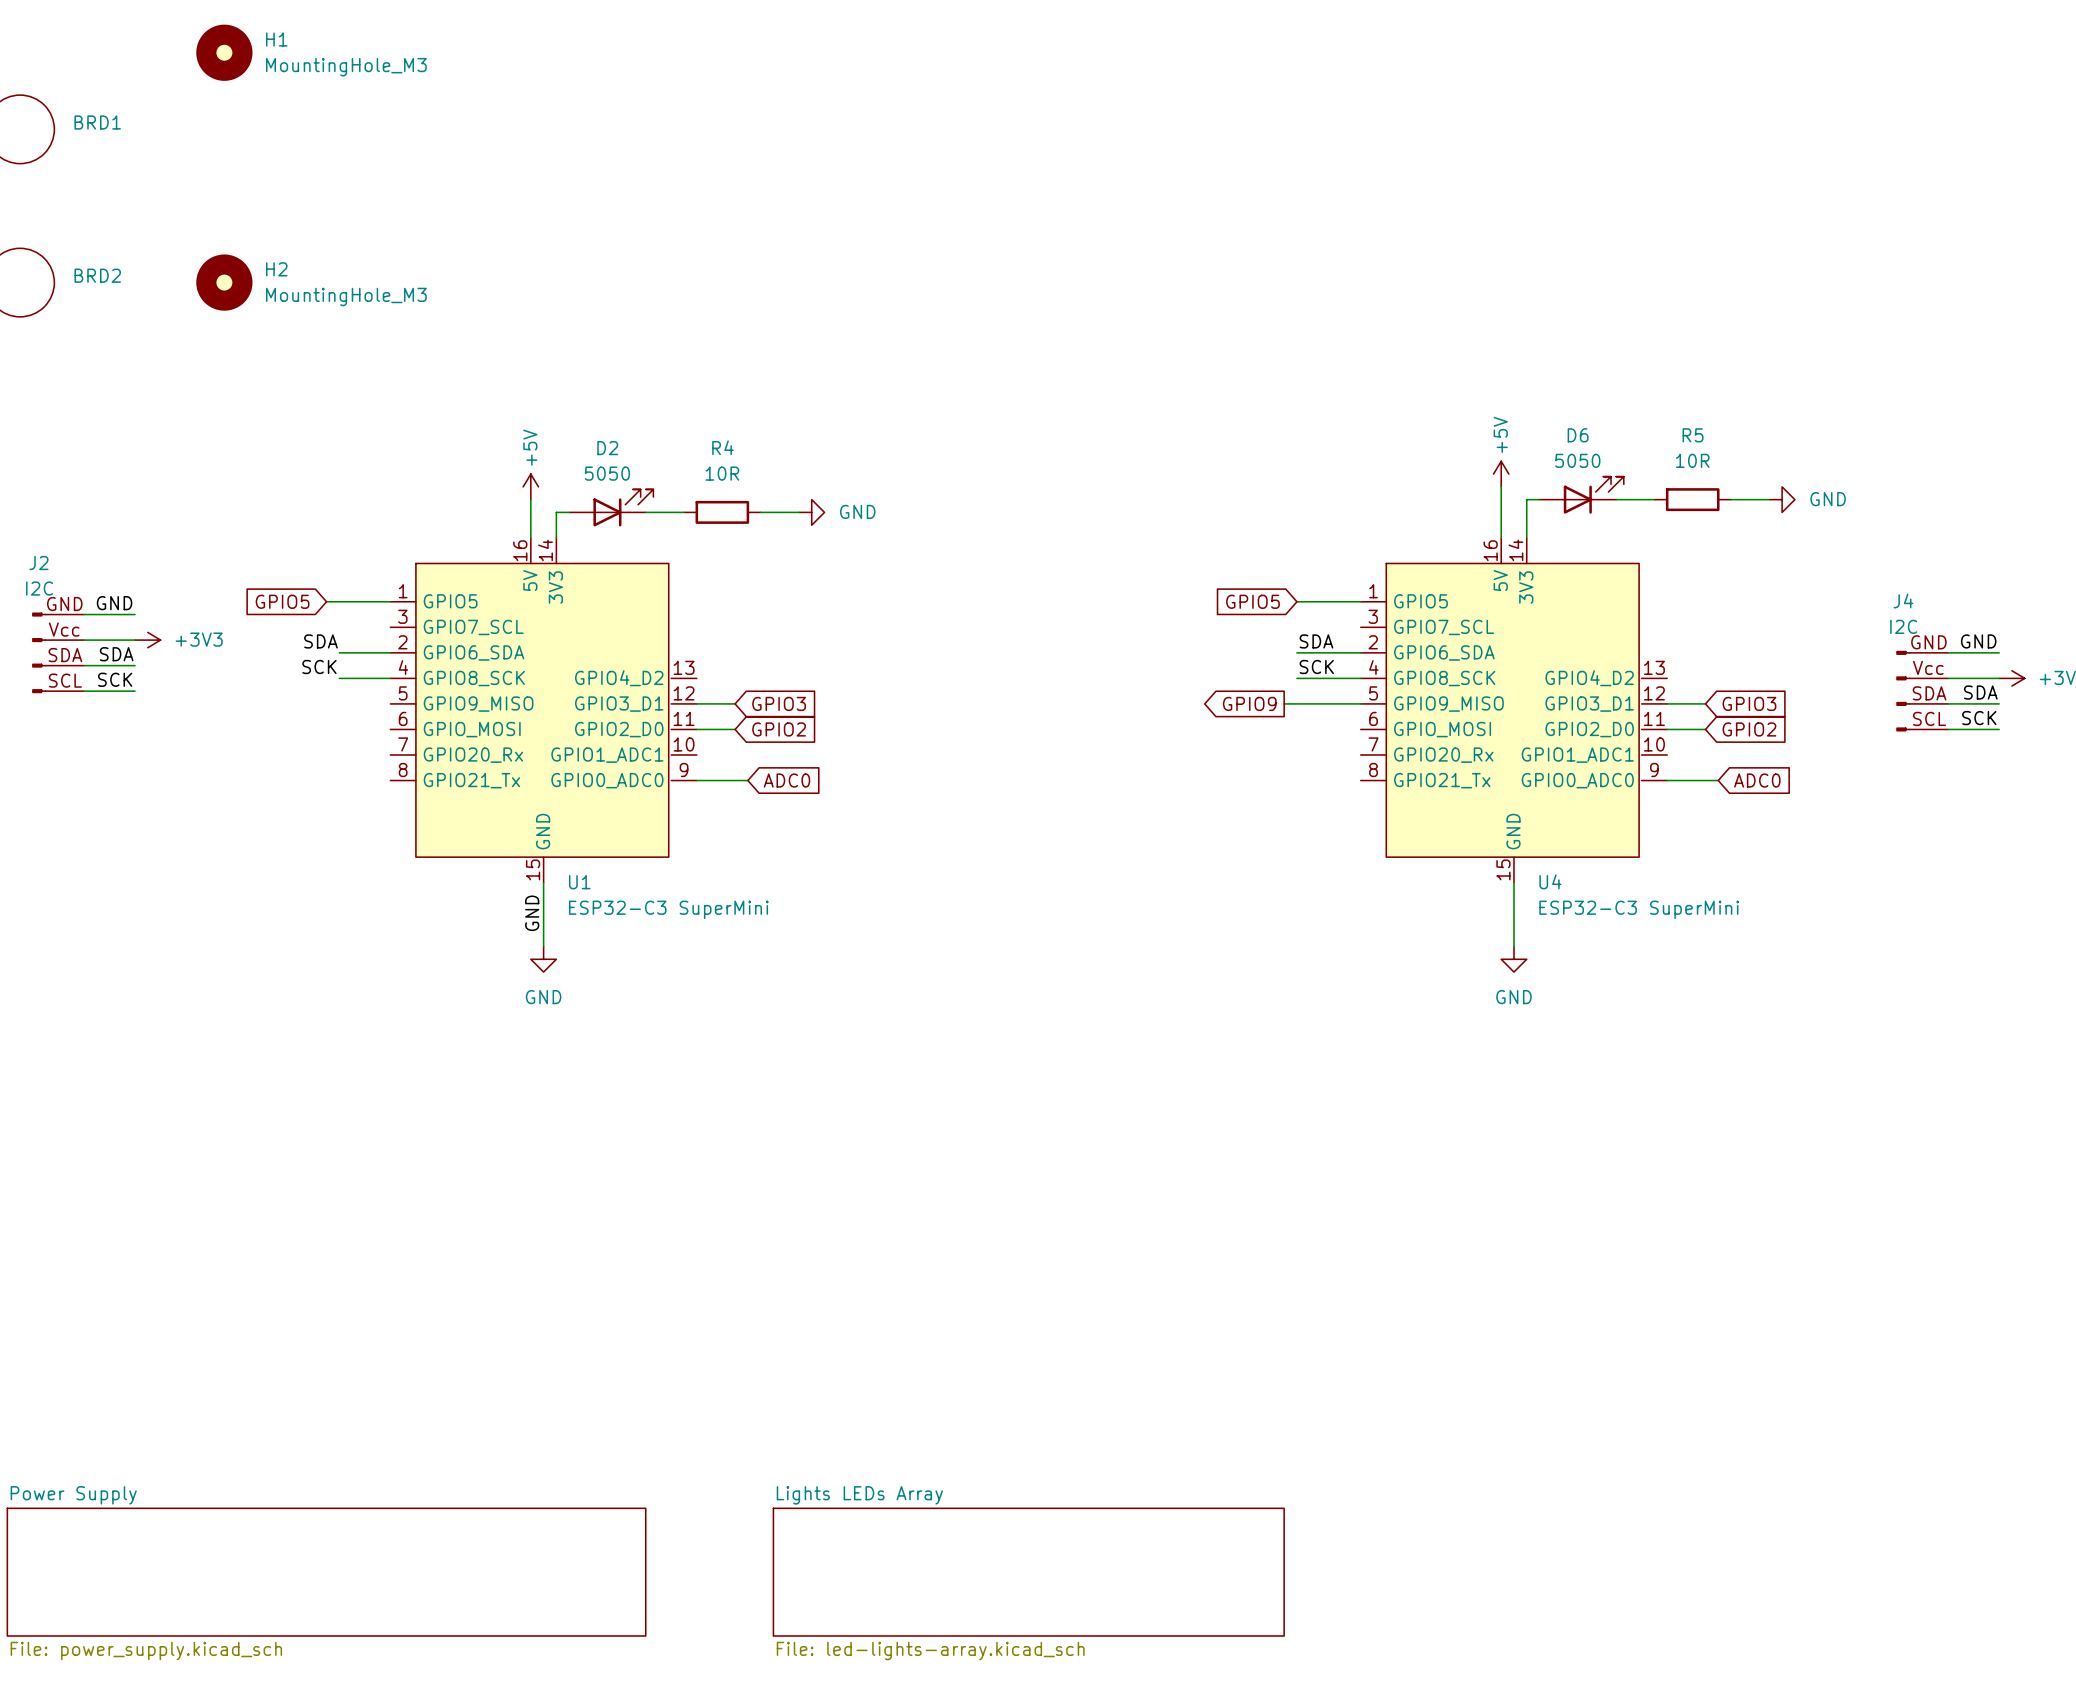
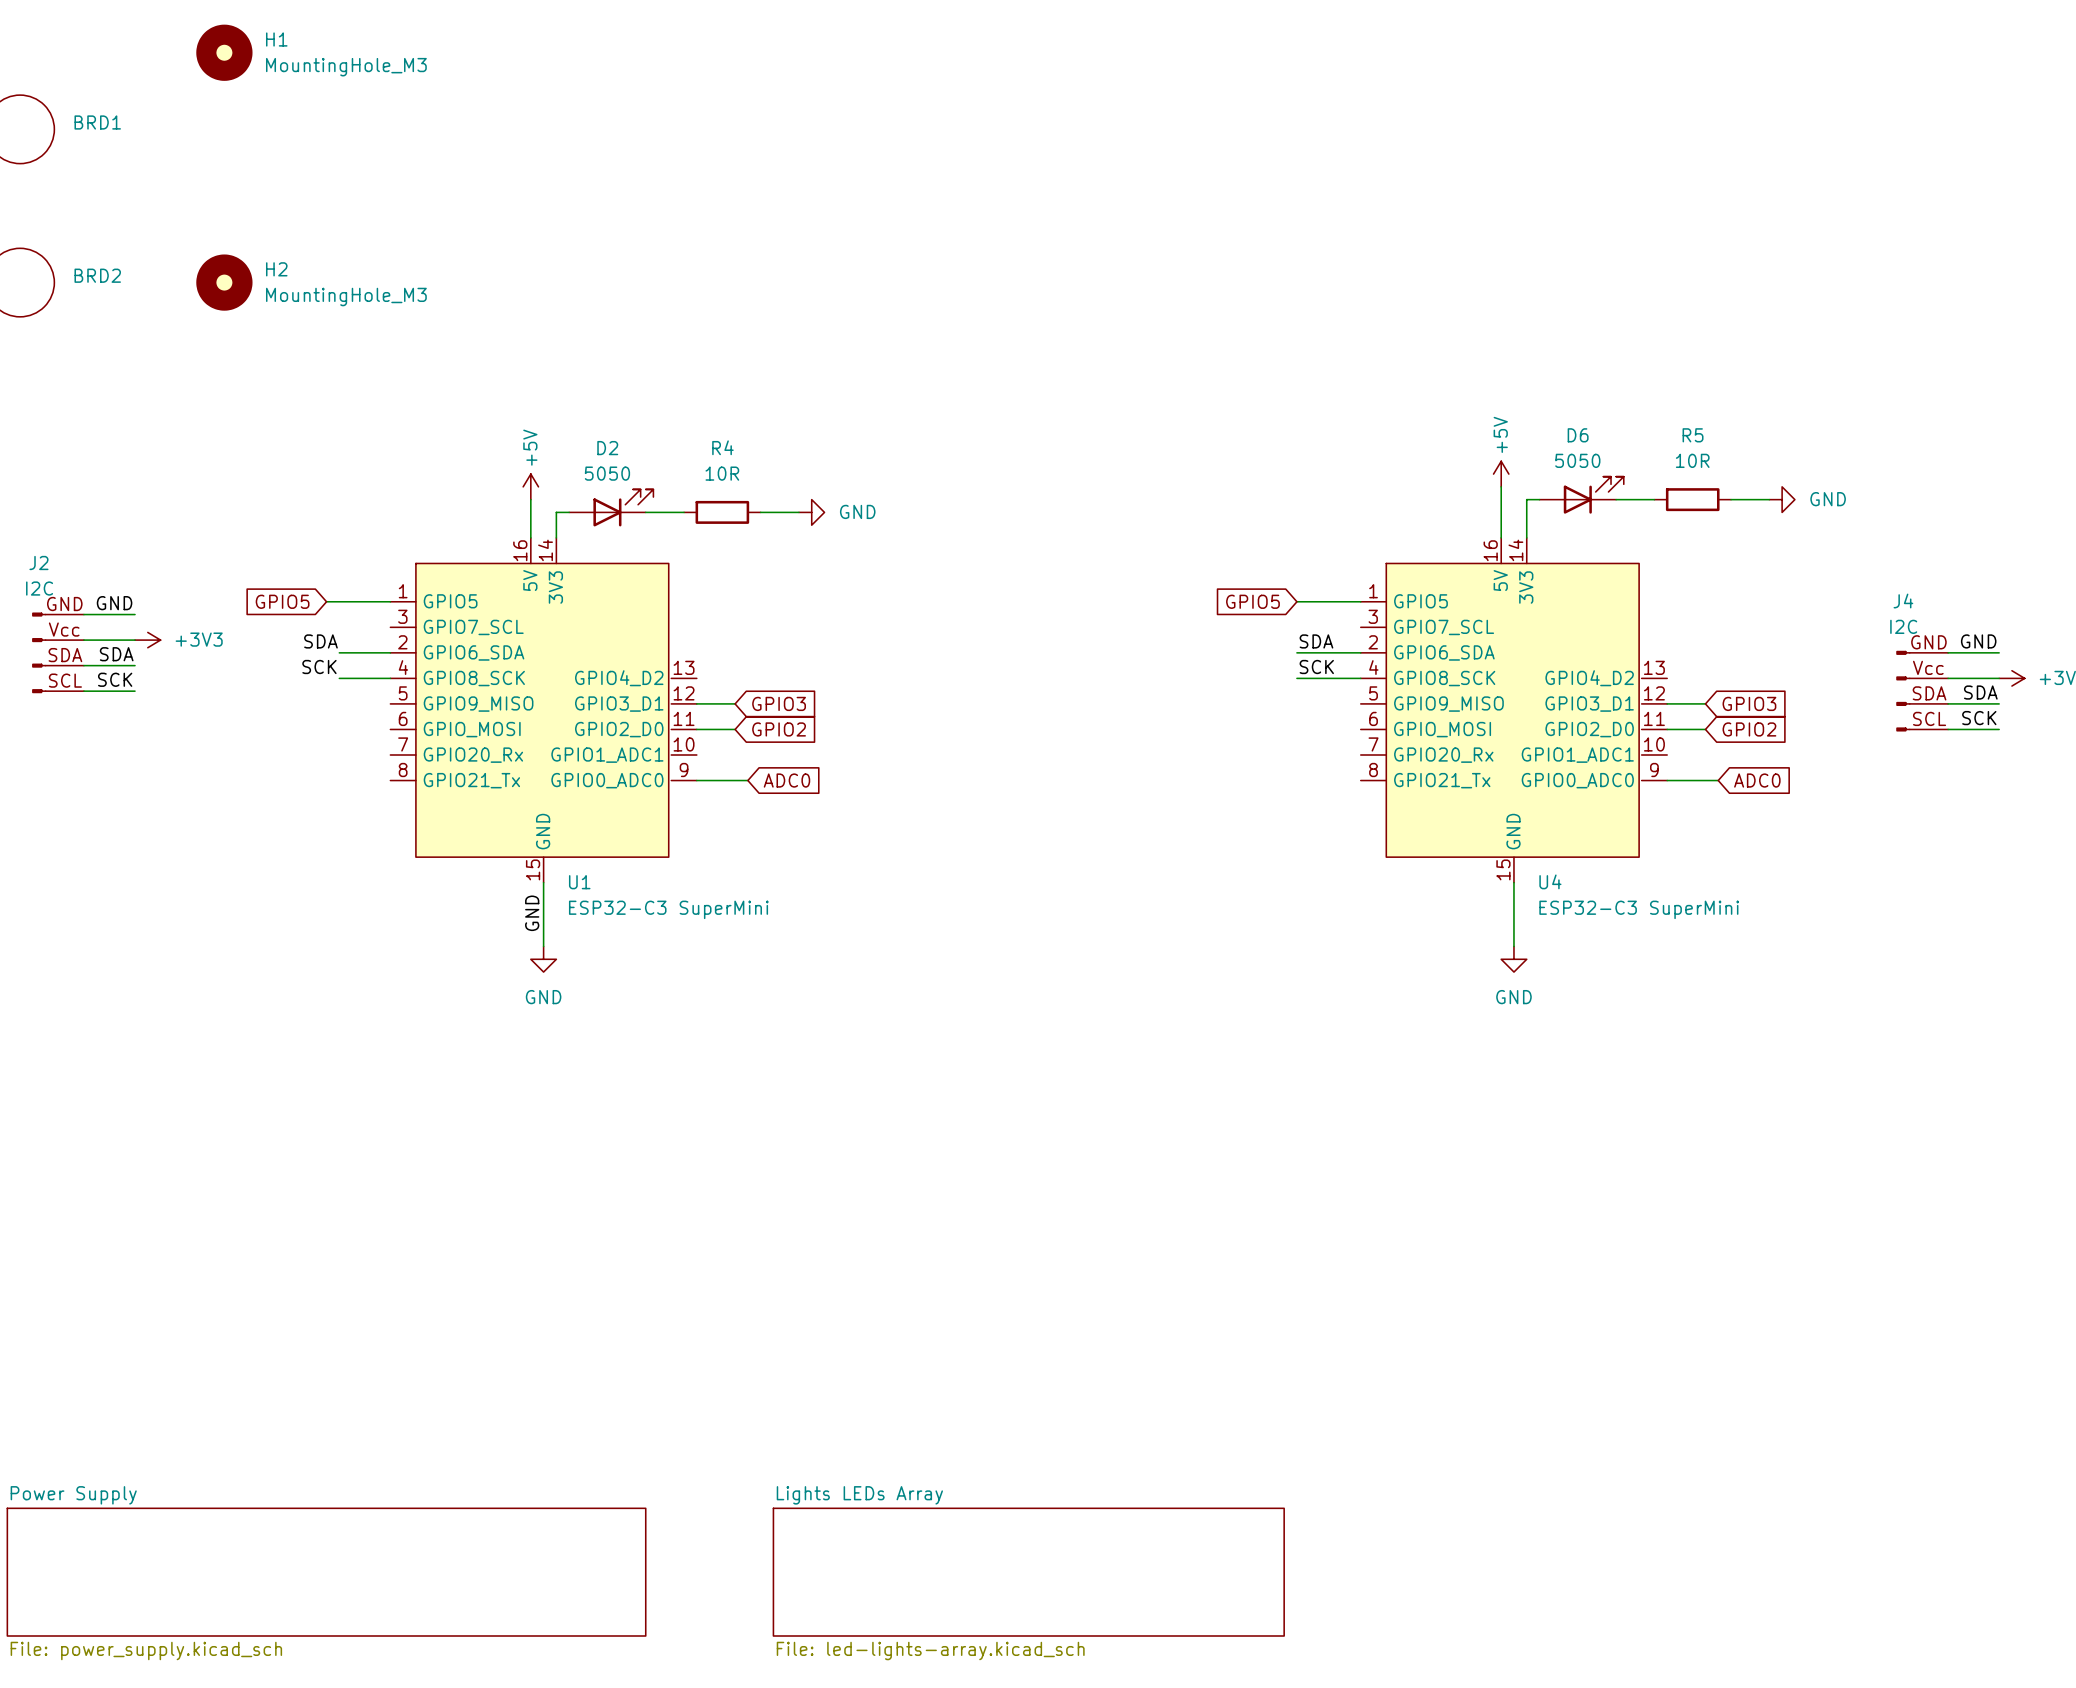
global label: GPIO9 (1249, 703) -> none
wire: (1284, 703) (1360, 703) -> none

